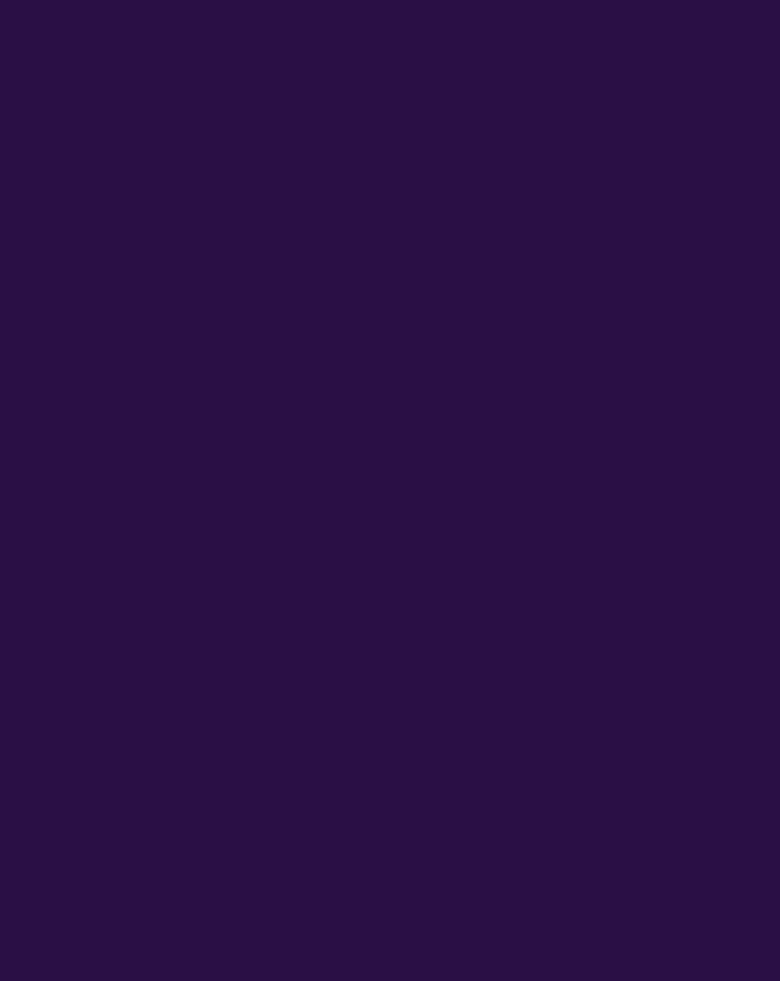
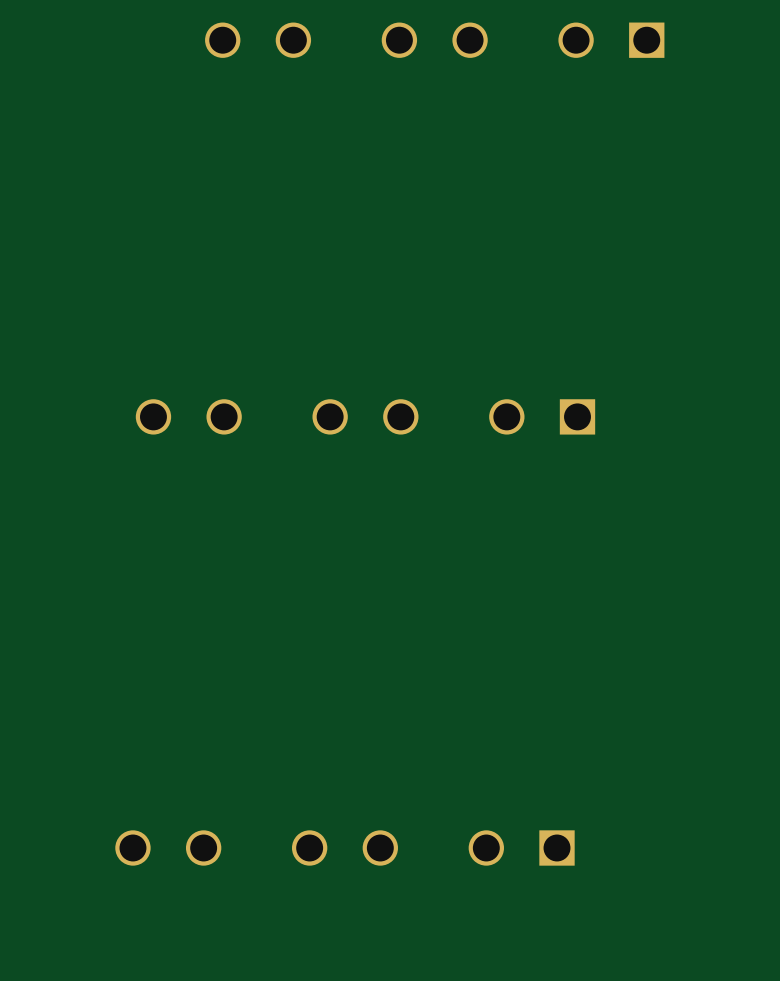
part: none -> (434, 40)
part: none -> (365, 416)
part: none -> (344, 847)

